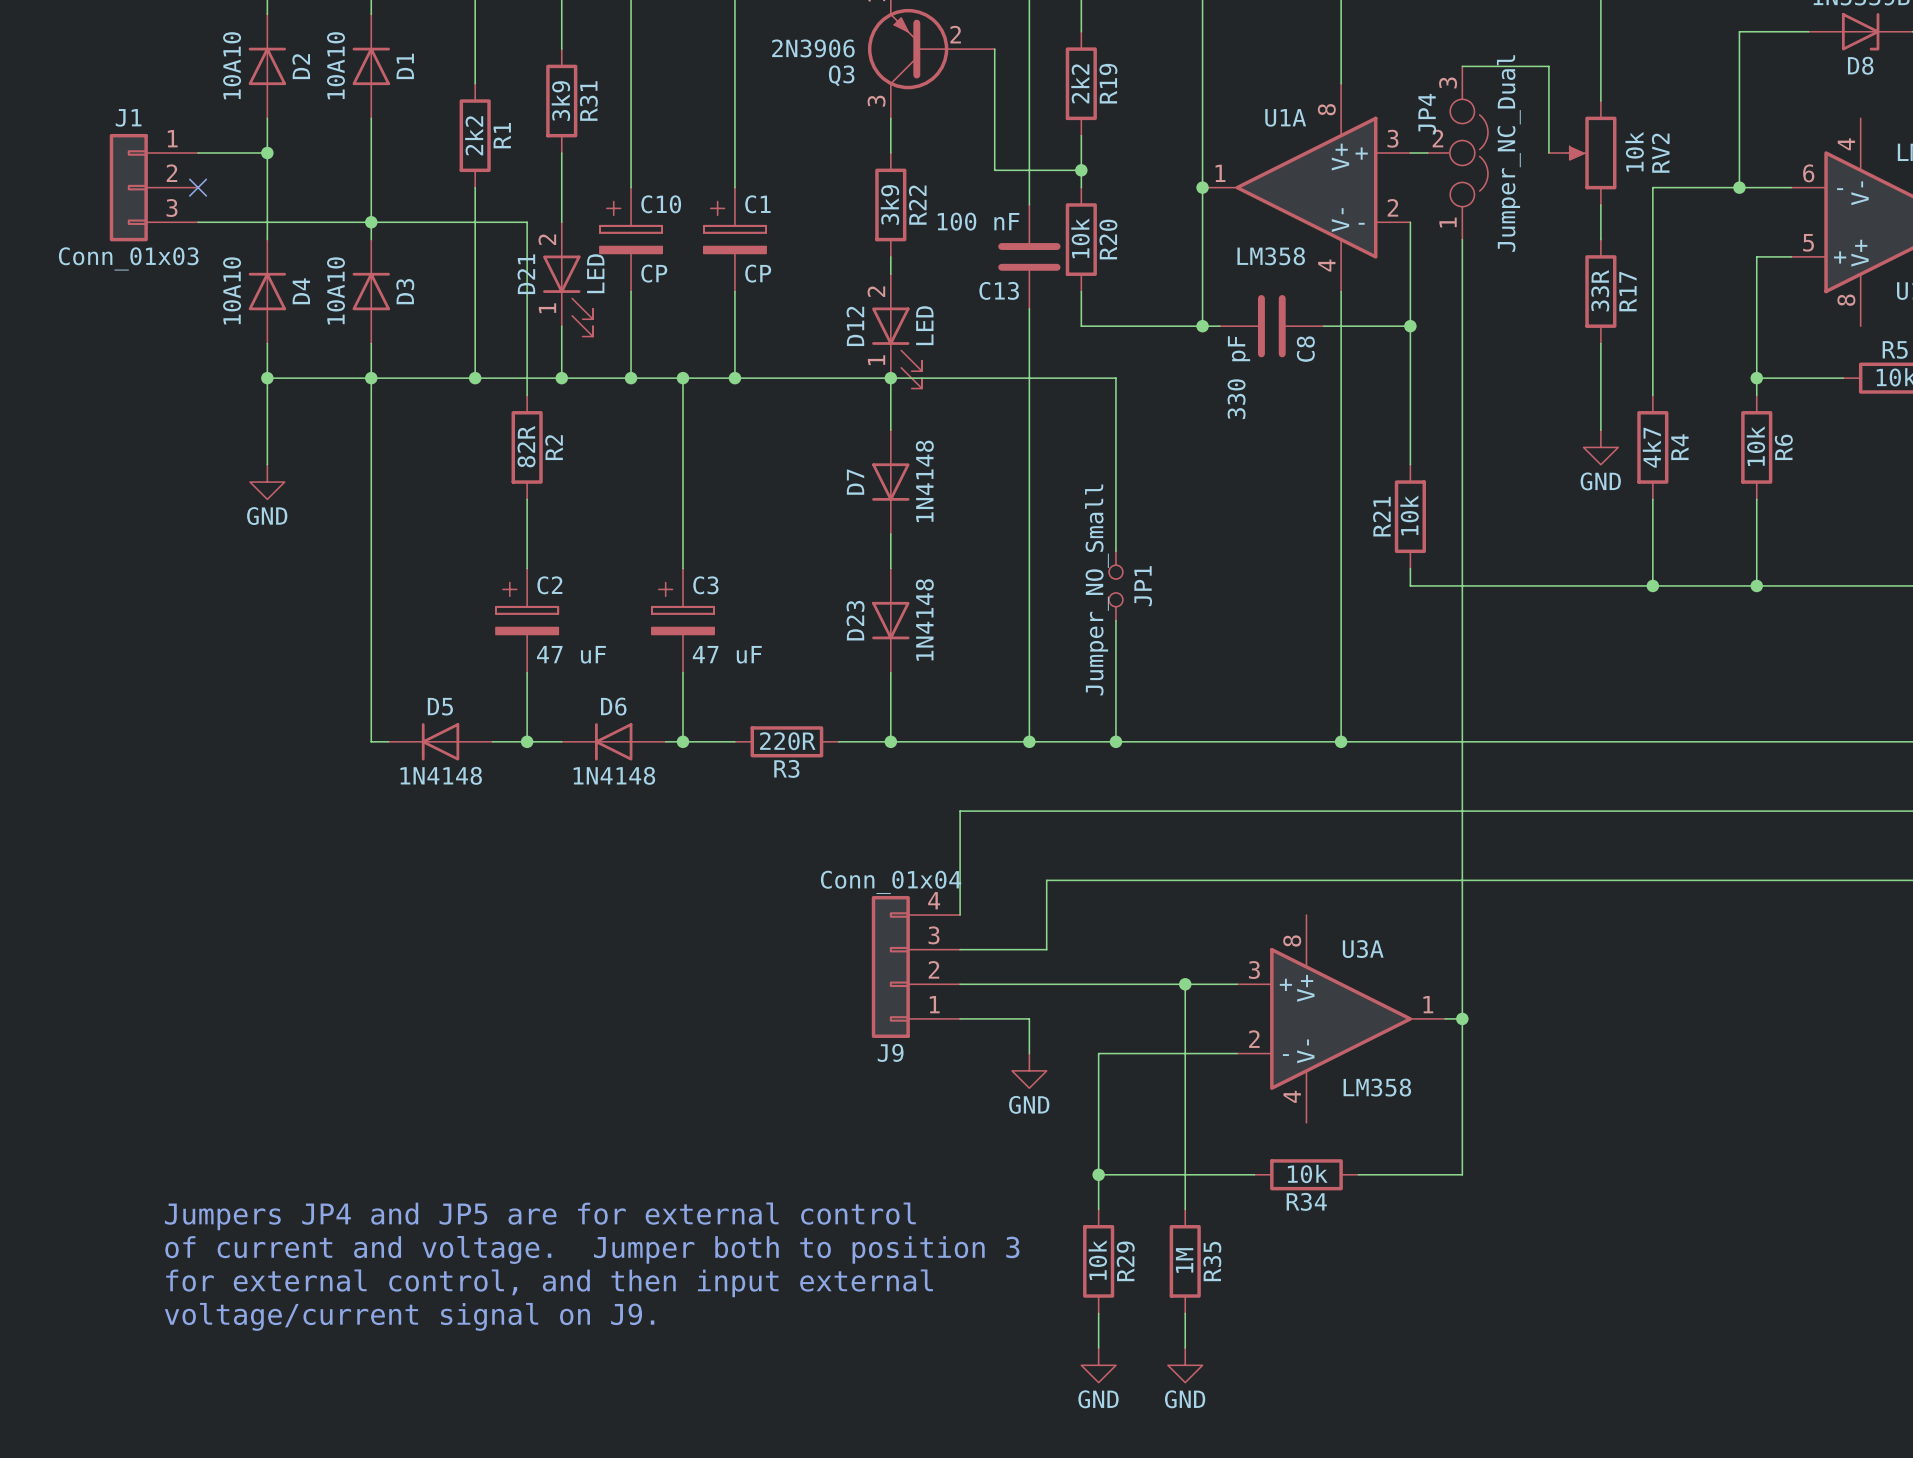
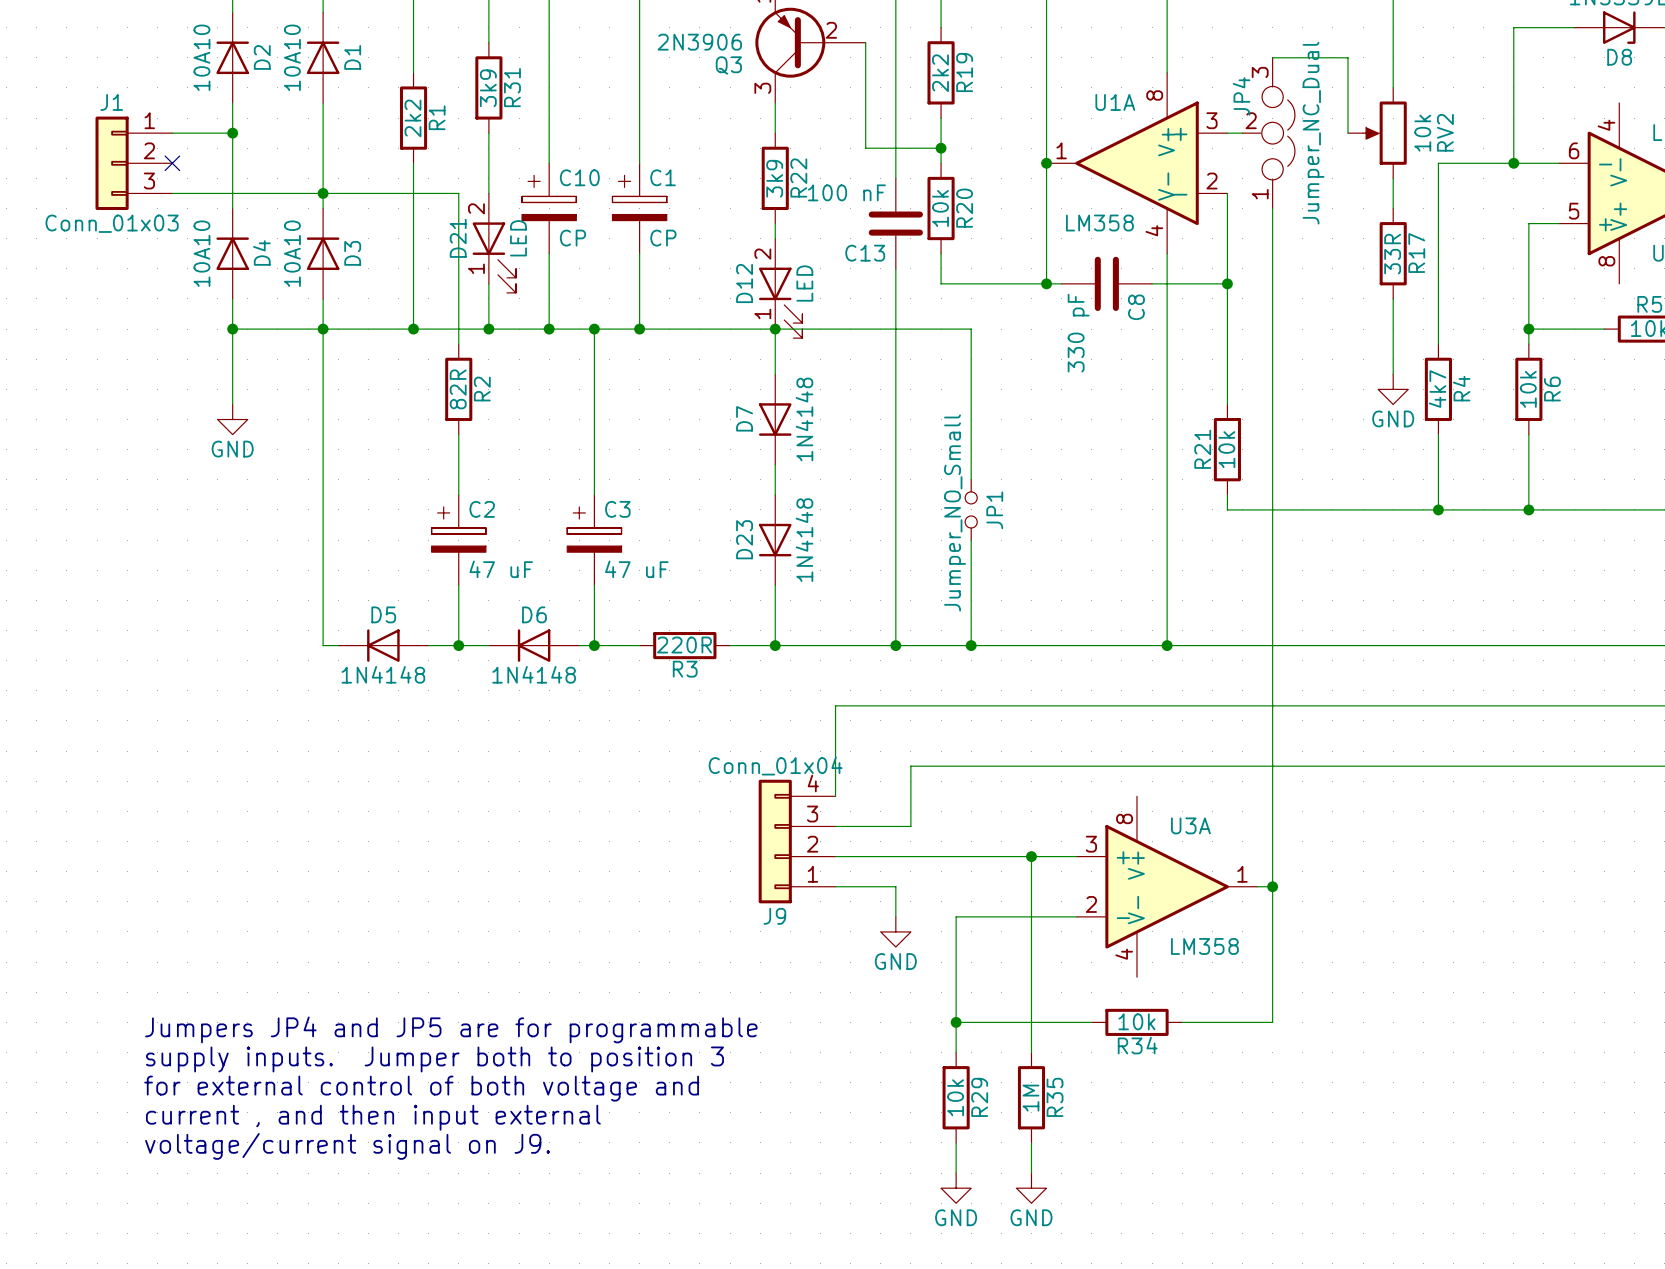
text: none -> Jumpers JP4 and JP5 are for programmable (451, 1029)
text: Jumpers JP4 and JP5 are for external control (540, 1216) -> supply inputs. Jumper both to position 3 (434, 1059)
text: of current and voltage. Jumper both to position 3 (592, 1249) -> for external control of both voltage and (421, 1088)
text: for external control, and then input external (549, 1283) -> current , and then input external (373, 1117)

